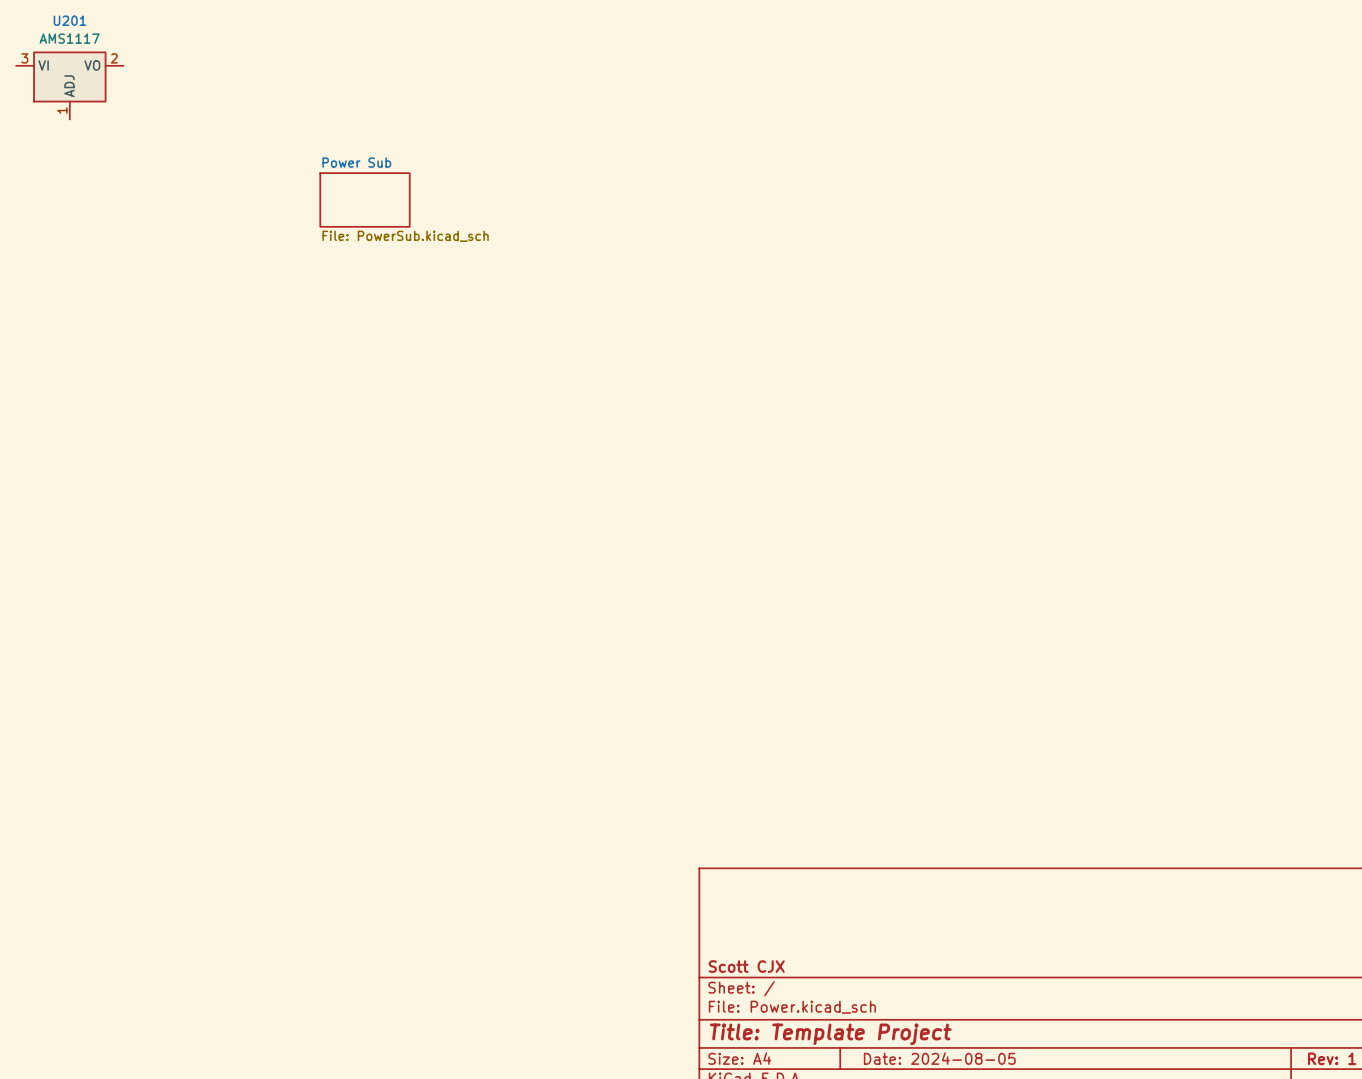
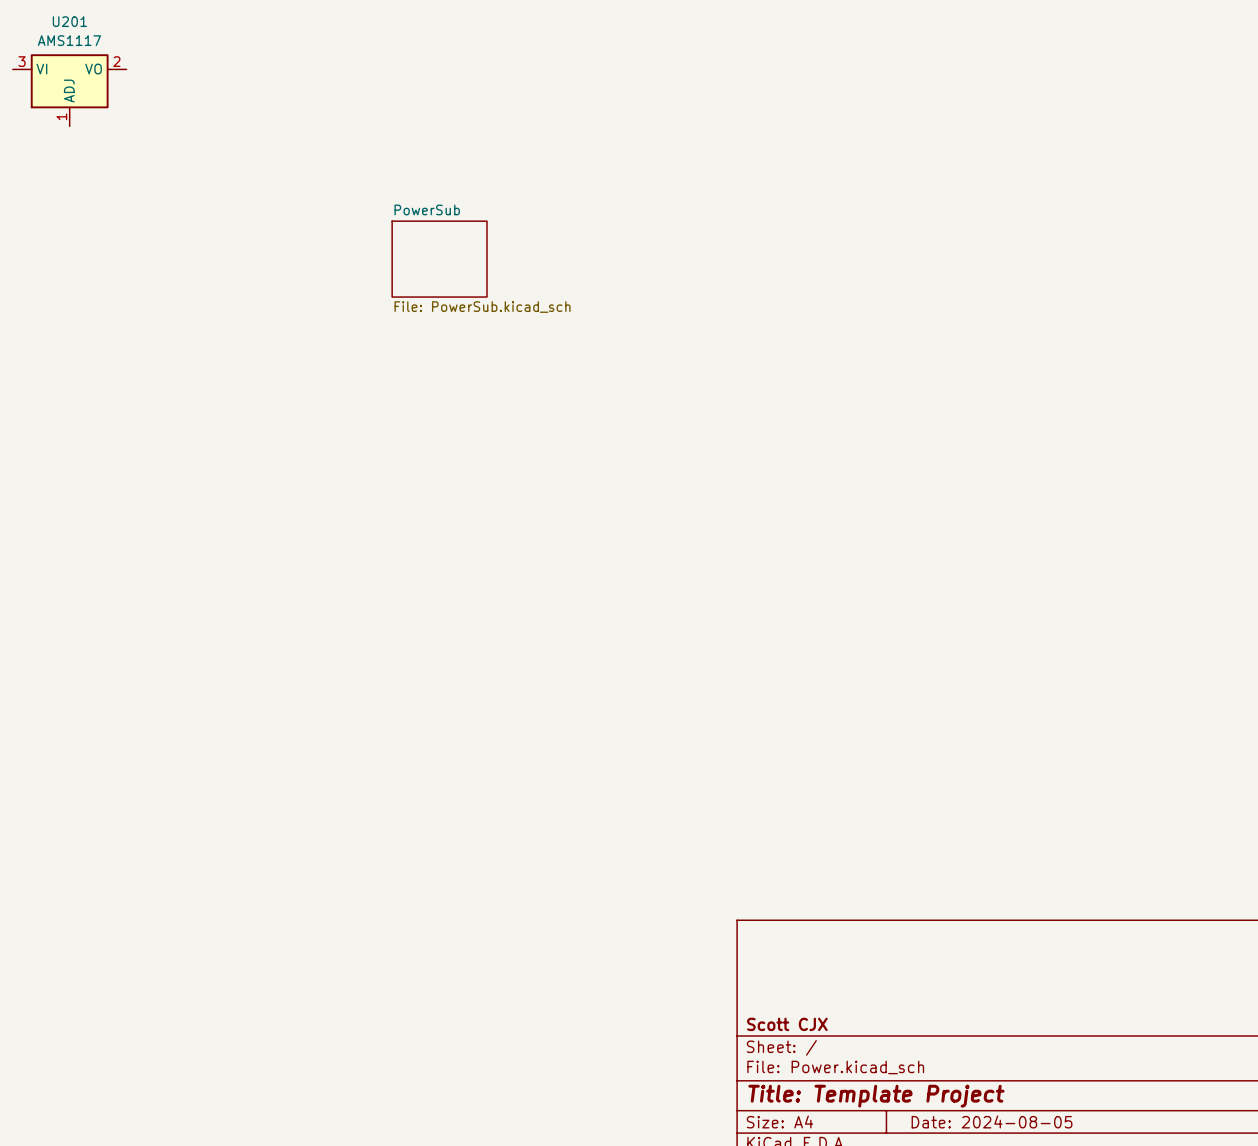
sheet Power Sub: File: PowerSub.kicad_sch (365, 199) -> none
sheet PowerSub: none -> File: PowerSub.kicad_sch (439, 259)

